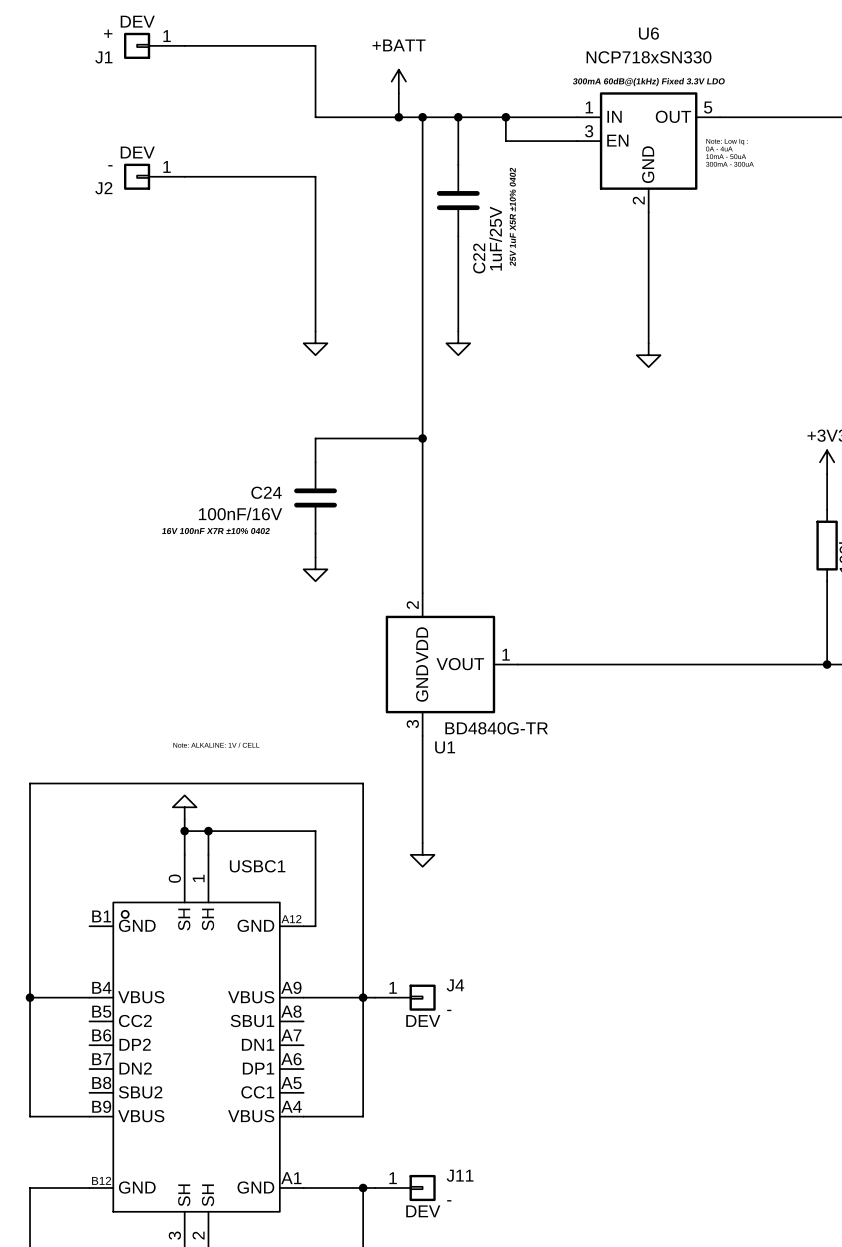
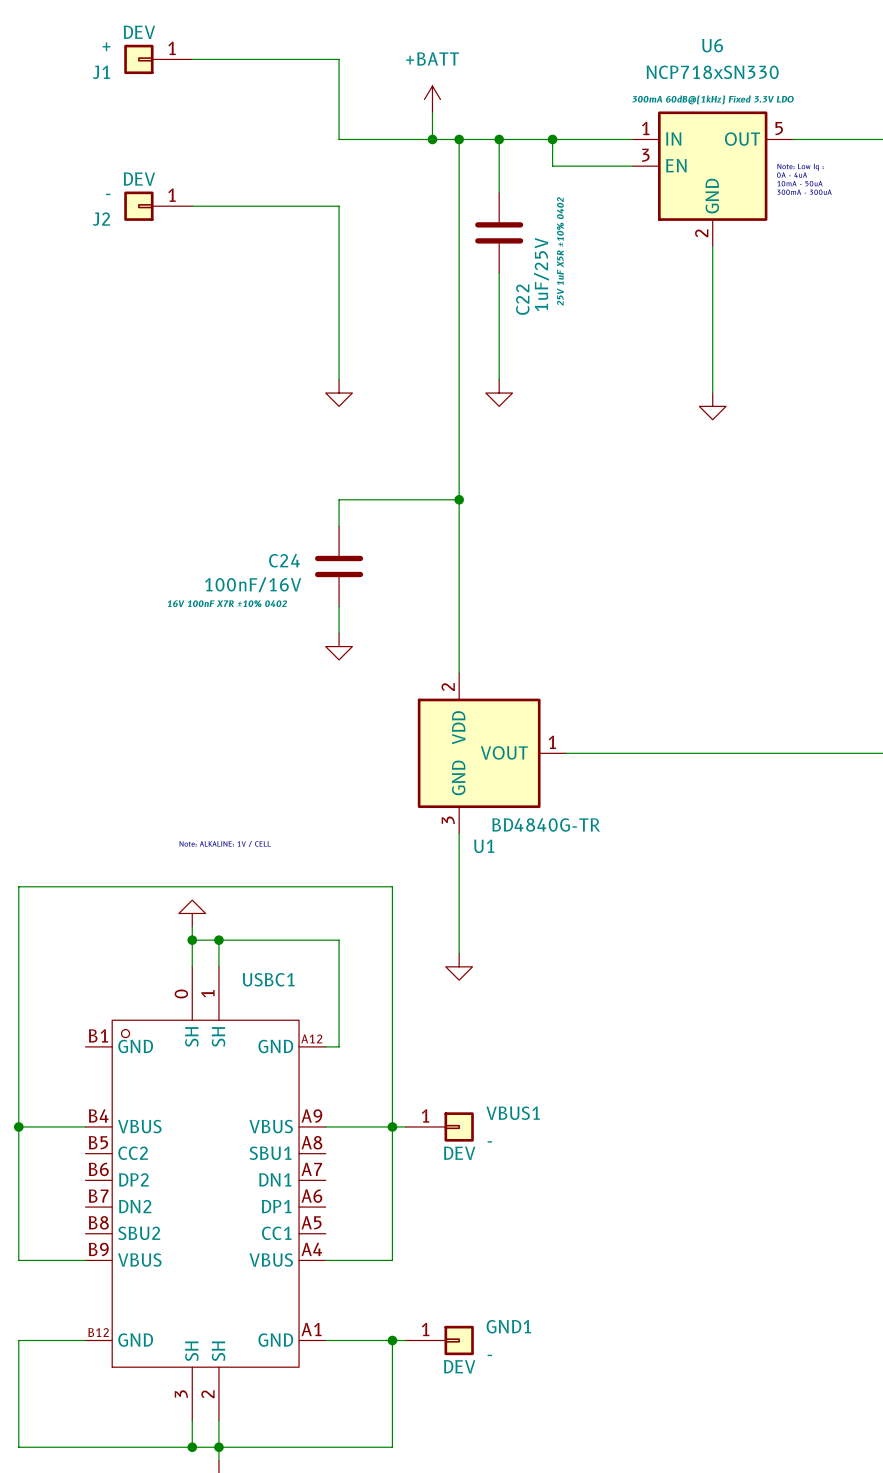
J4 name: J4 (455, 985) -> VBUS1 (513, 1113)
J11 name: J11 (460, 1175) -> GND1 (508, 1326)

